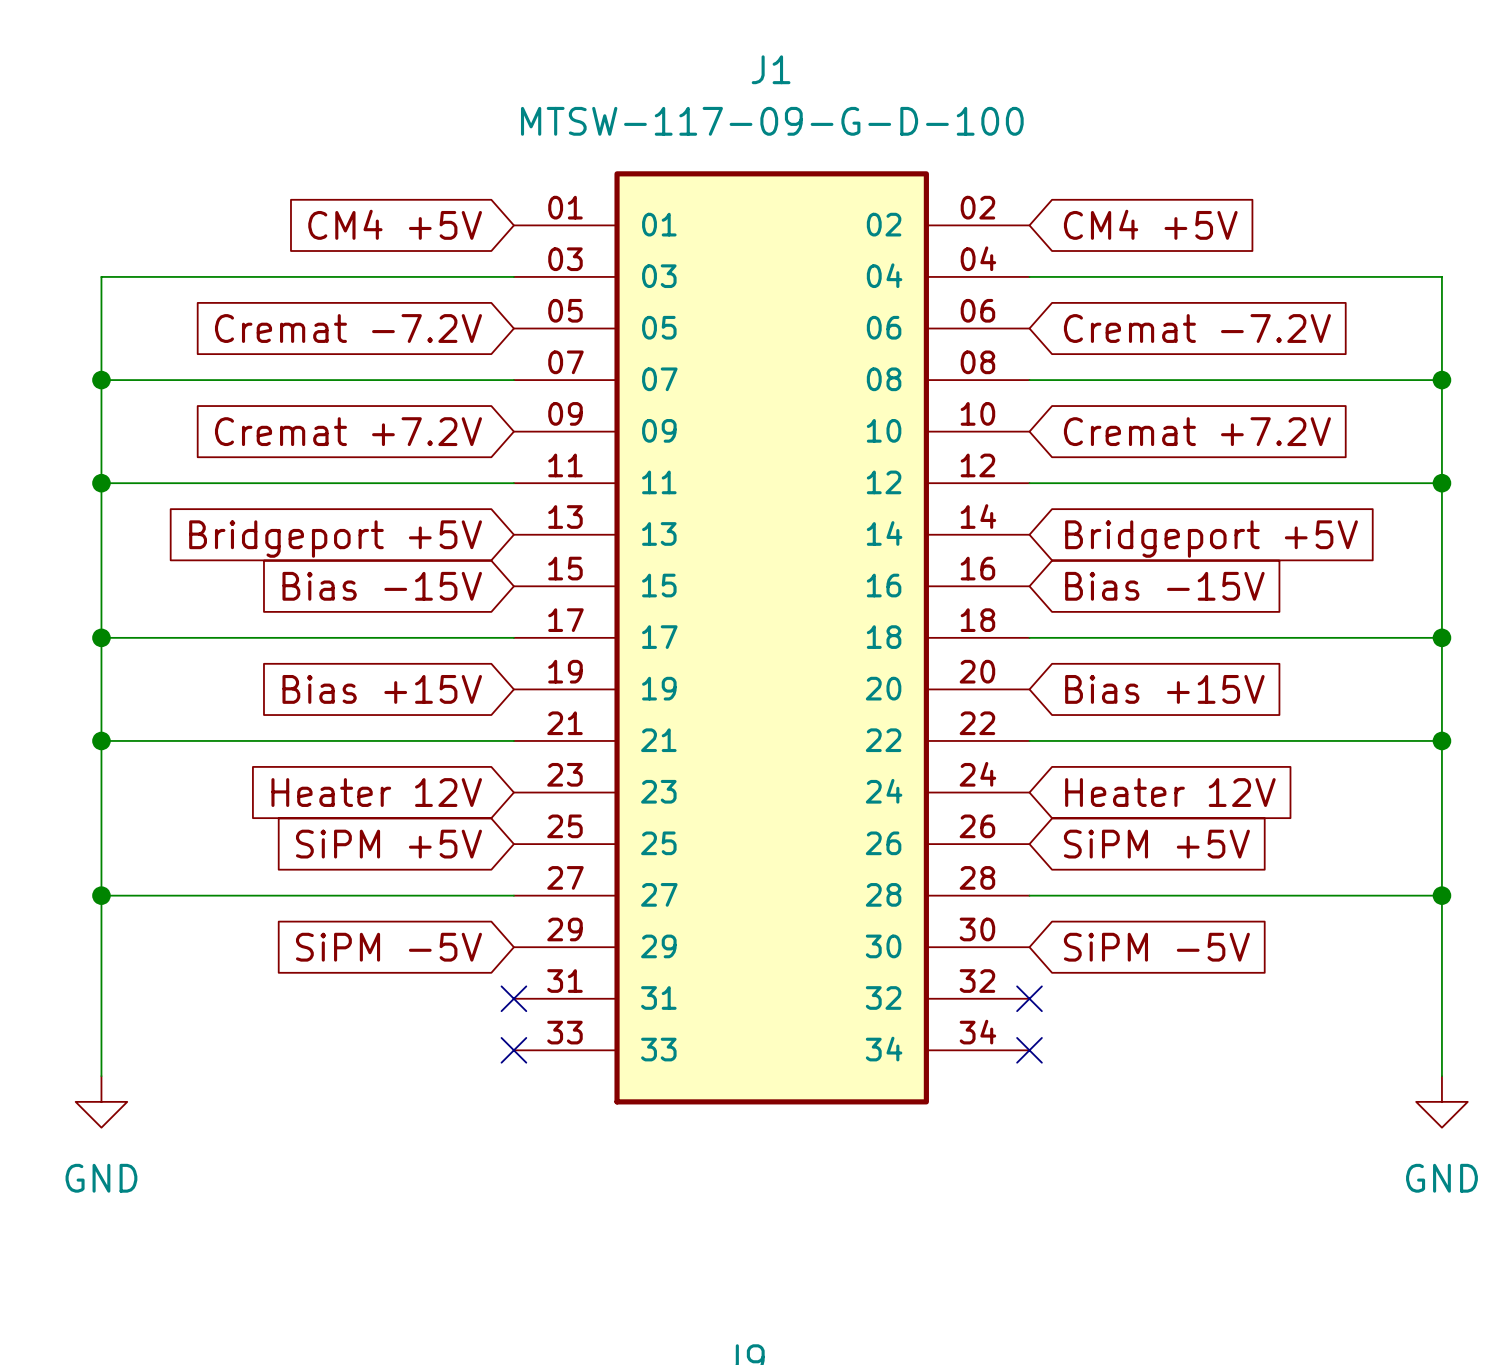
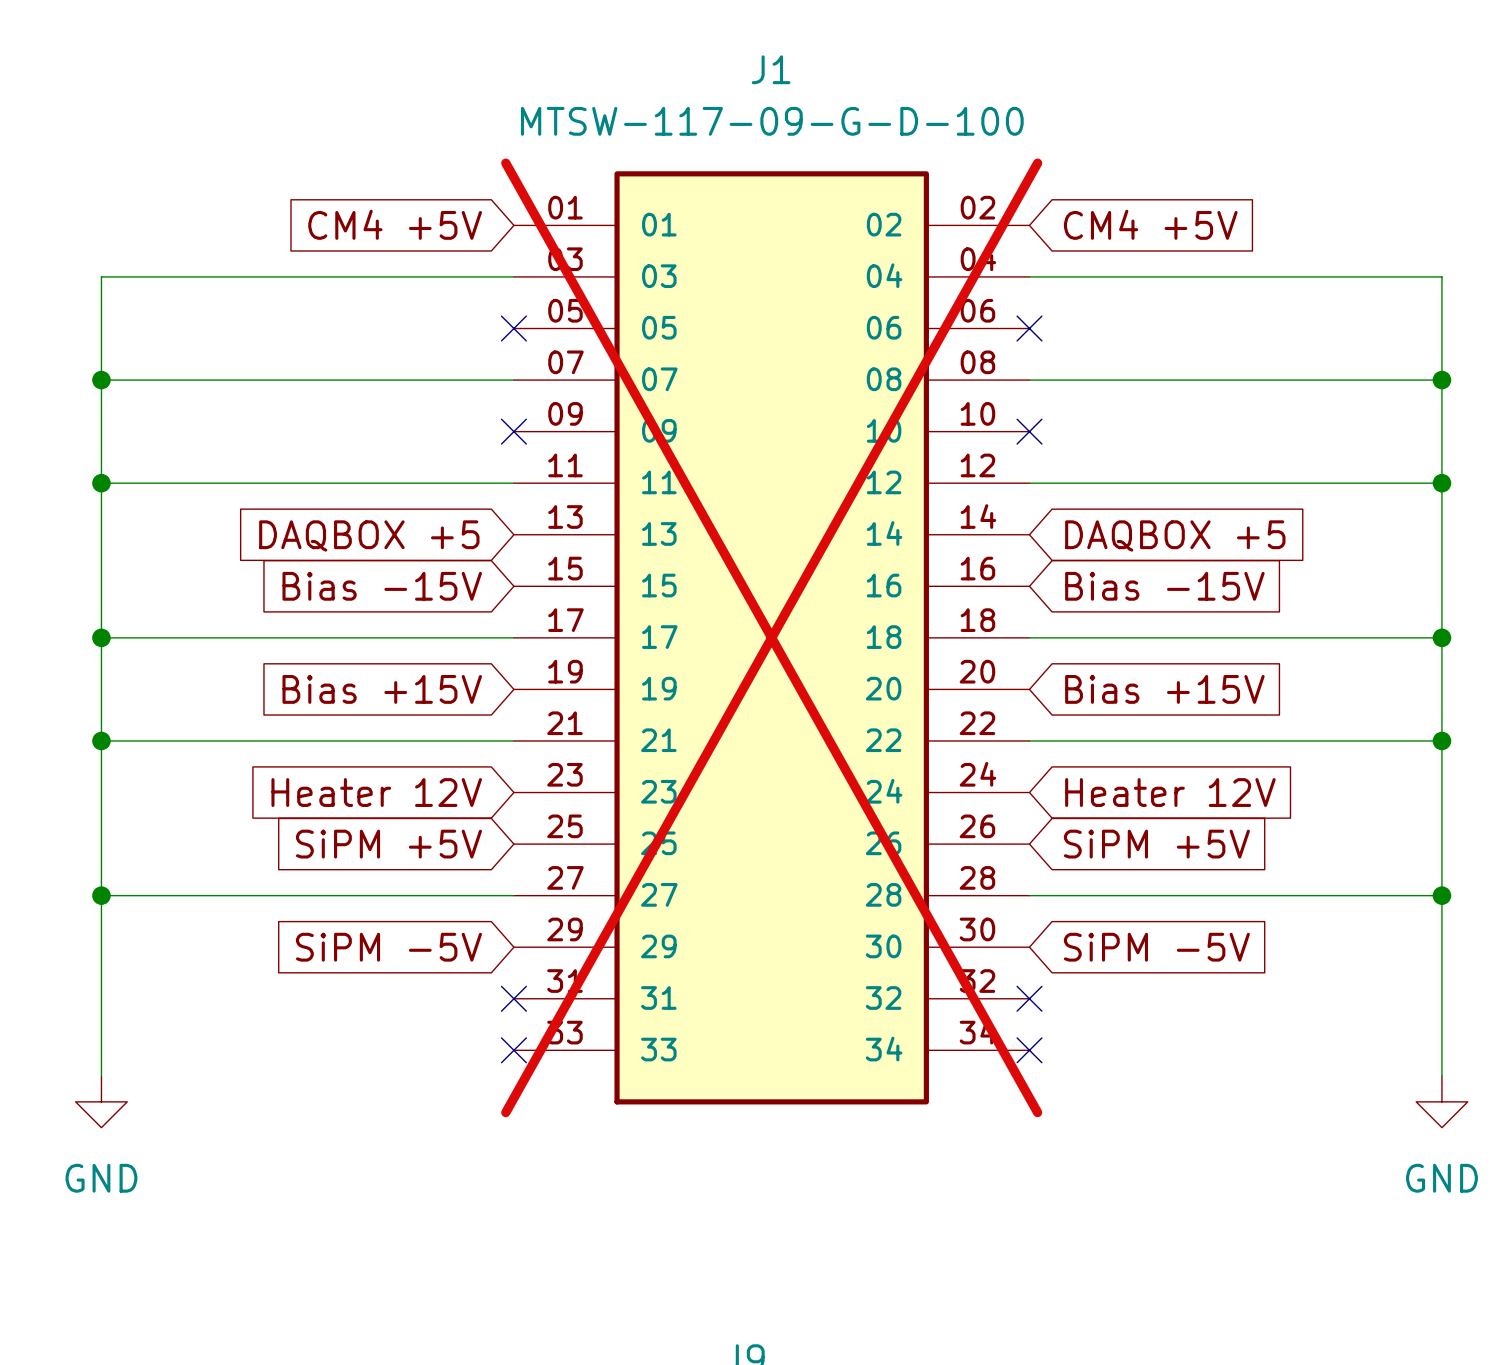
global label: Cremat -7.2V (348, 328) -> none
no-connect mark: none -> (513, 328)
no-connect mark: none -> (1029, 328)
global label: Cremat -7.2V (1197, 328) -> none
global label: Cremat +7.2V (348, 431) -> none
no-connect mark: none -> (513, 431)
no-connect mark: none -> (1029, 431)
global label: Cremat +7.2V (1197, 431) -> none
global label: Bridgeport +5V (335, 539) -> DAQBOX +5 (369, 535)
global label: Bridgeport +5V (1211, 539) -> DAQBOX +5 (1175, 535)
J1 do-not-place cross: none -> (771, 637)

